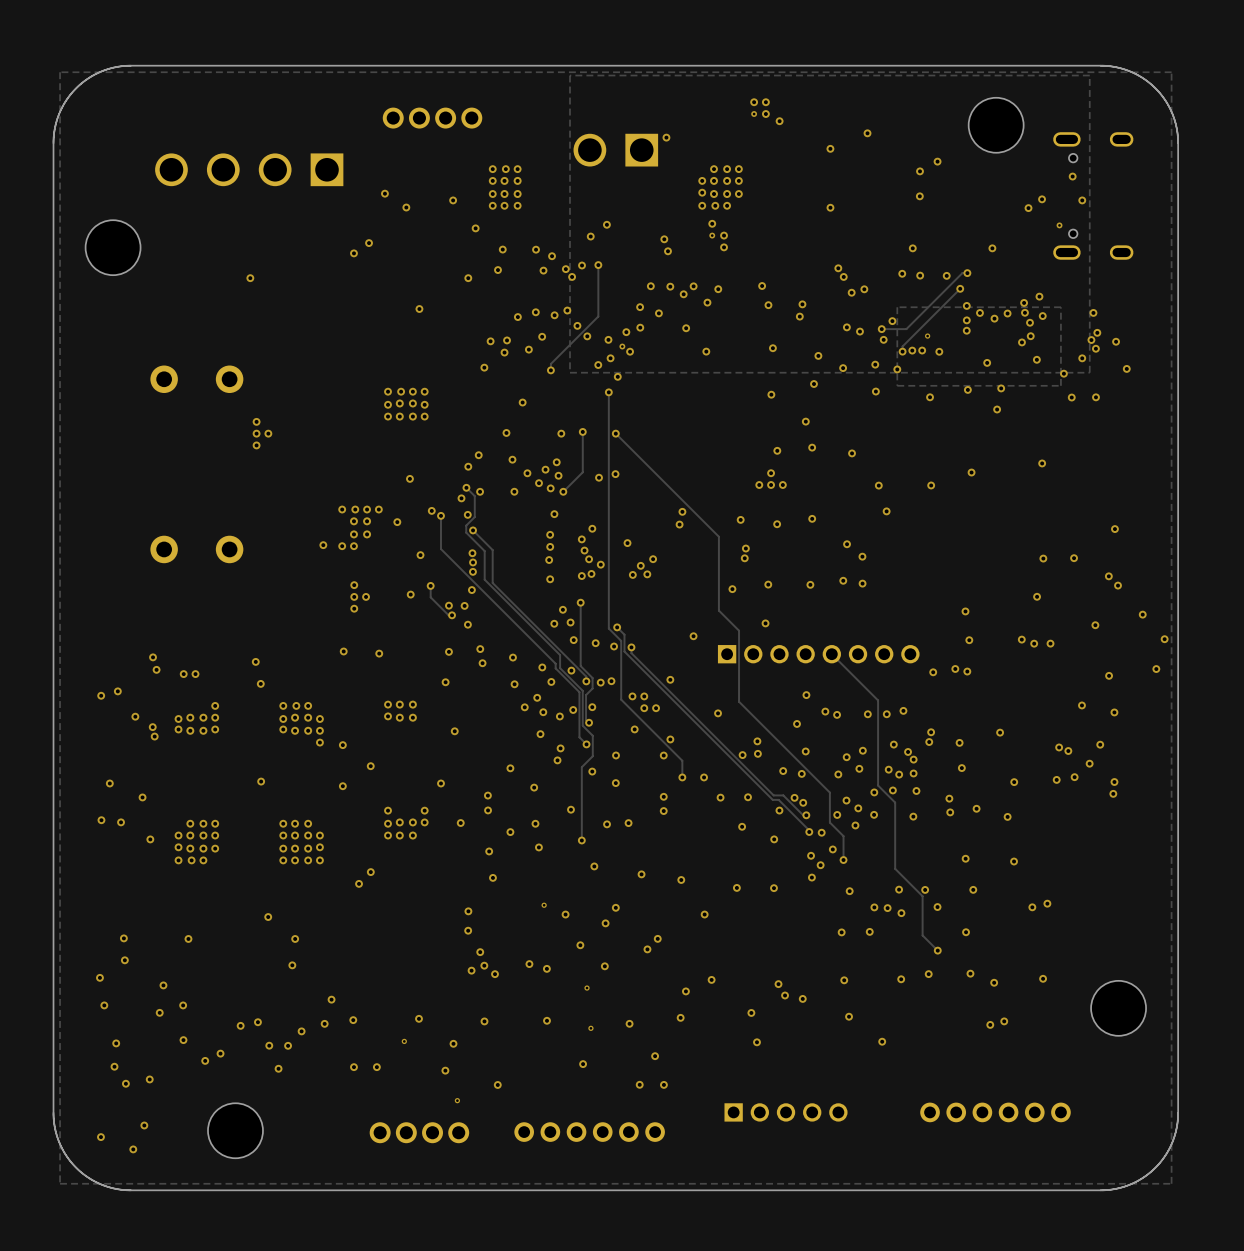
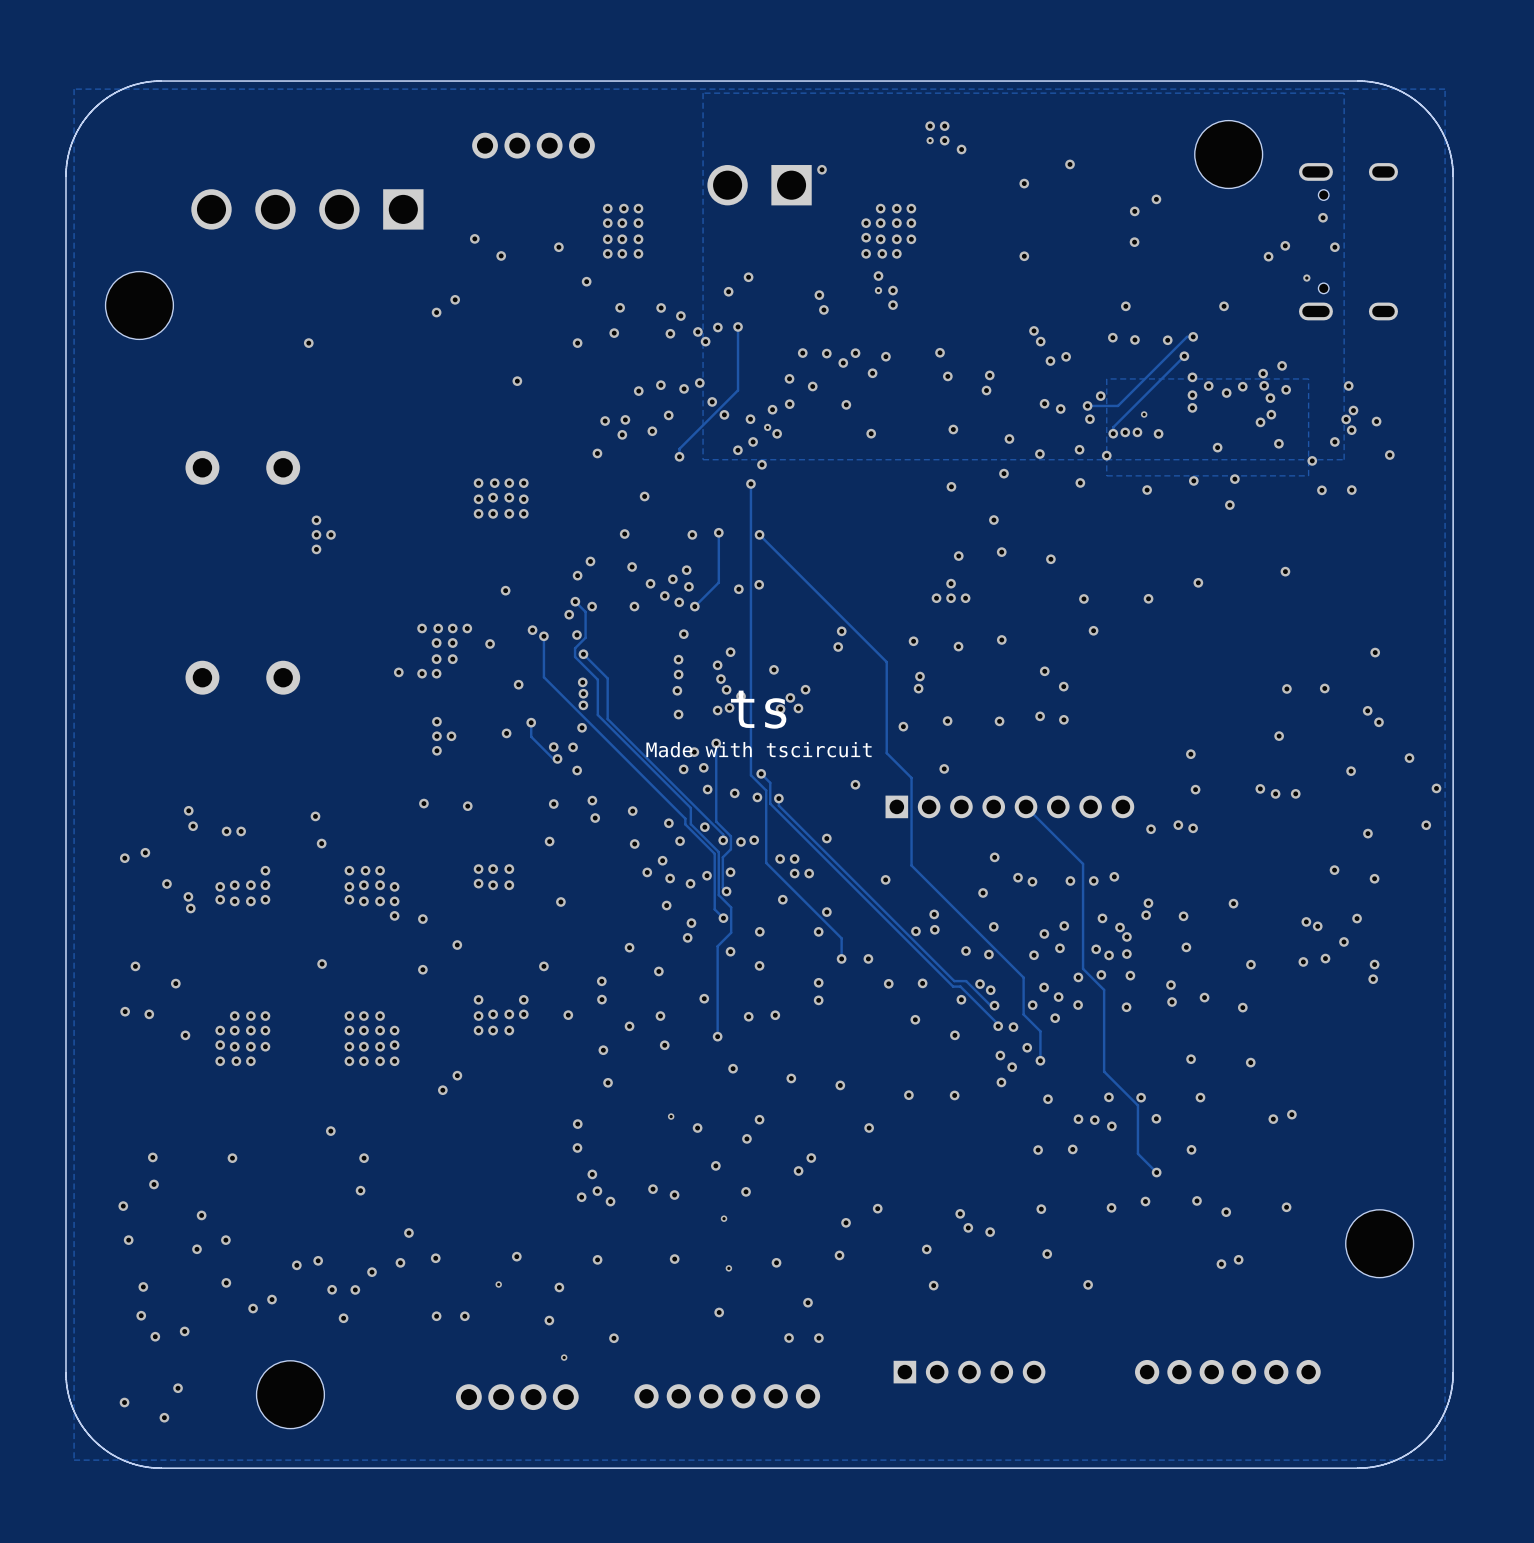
text: none -> ts (758, 709)
text: none -> Made with tscircuit (759, 749)

